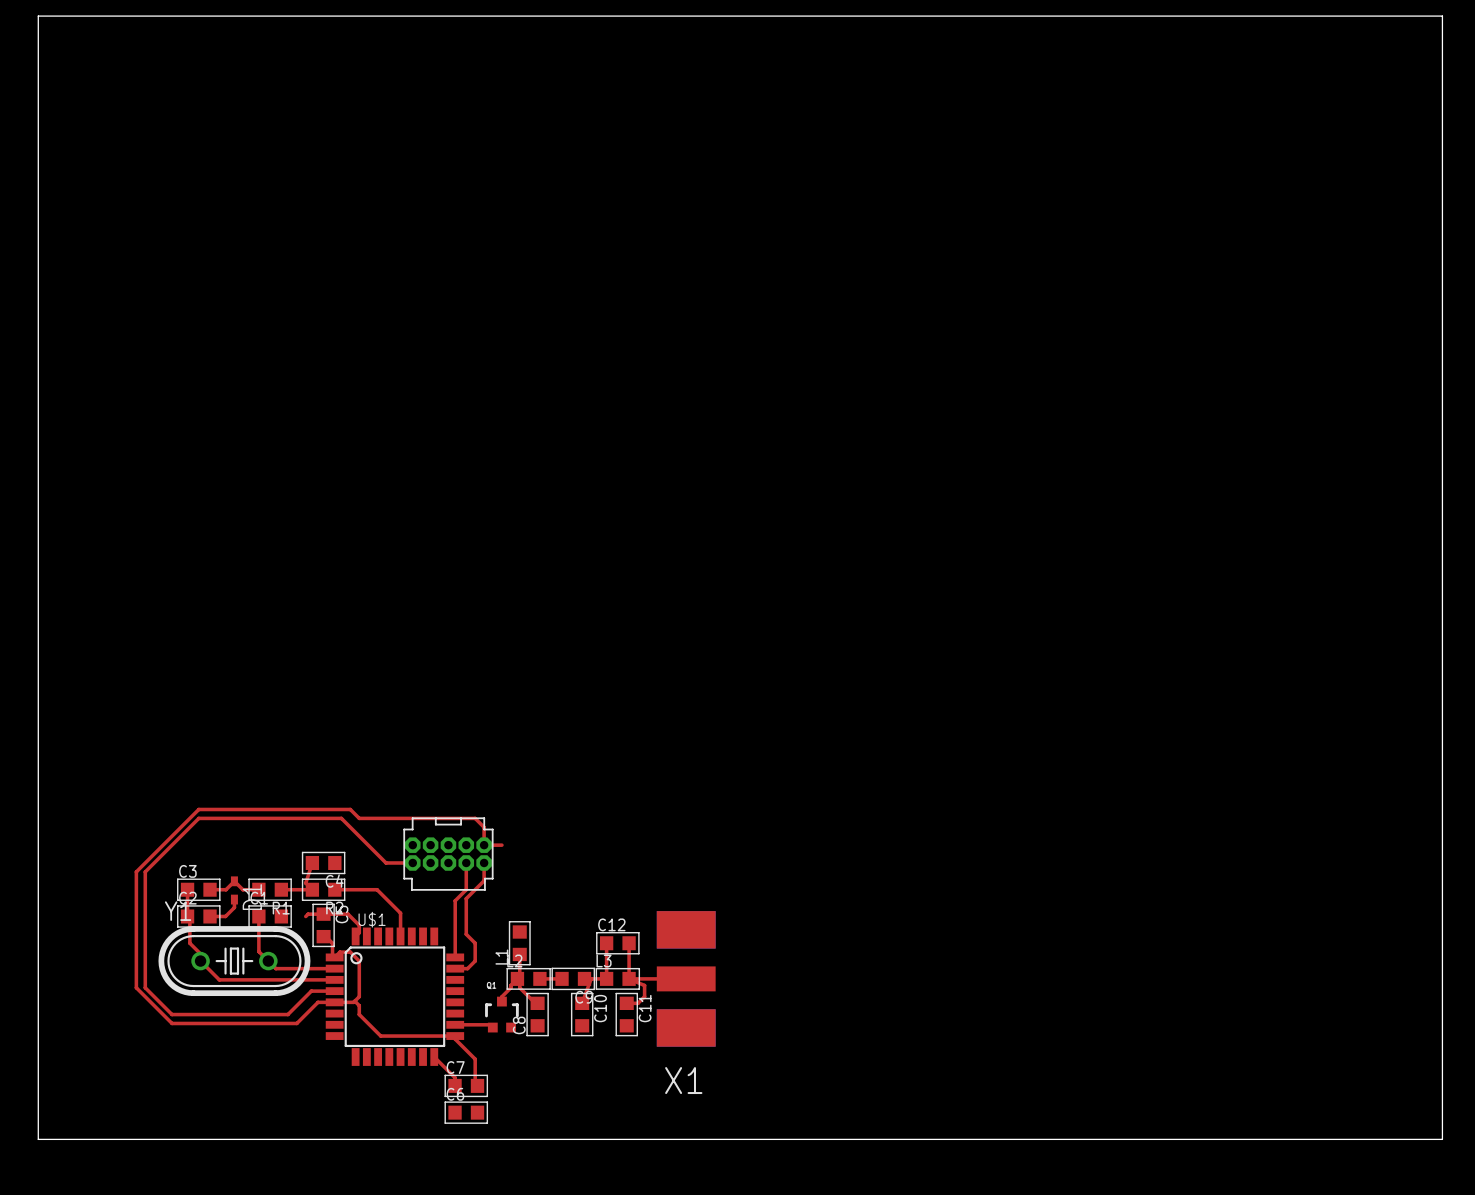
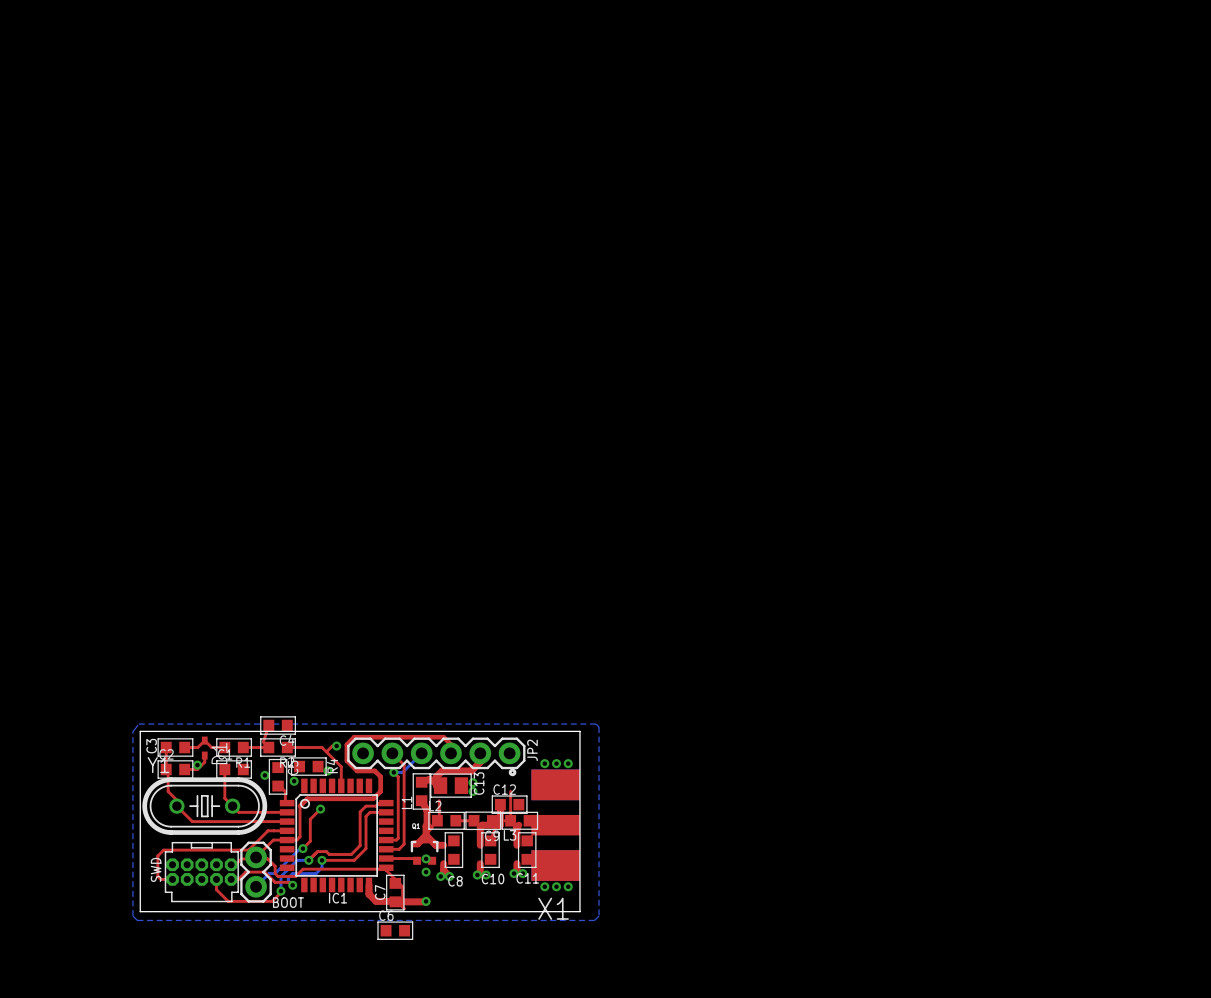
board edge: (38, 16) (1442, 16) (1442, 1139) (38, 1139) (38, 16) -> none
top track: (501, 845) (484, 845) (484, 827) (475, 818) (359, 818) (350, 809) (198, 809) (136, 871) (136, 987) (172, 1023) (296, 1023) -> none
part position: (448, 854) -> (201, 872)
bottom zone outline: none -> (138, 724) (596, 724) (599, 726) (599, 916) (594, 920) (137, 920) (132, 916) (132, 731) (138, 724)
top track: (412, 862) (386, 862) (341, 818) (198, 818) (145, 871) (145, 987) (172, 1014) (184, 1014) -> (172, 879) (160, 879) (157, 876) (157, 855) (163, 850)
top track: (466, 862) (466, 889) (455, 900) (455, 957) -> (308, 860) (317, 851) (326, 851) (329, 854) (351, 854) (360, 845) (360, 812) (365, 806) (376, 806) (379, 803) (386, 803)
top track: (484, 862) (484, 880) (466, 898) (466, 934) (475, 943) (475, 961) (467, 968) (455, 968) -> (322, 860) (354, 860) (365, 848) (365, 816) (370, 812) (386, 812)
board edge: none -> (140, 731) (579, 731) (579, 911) (140, 911) (140, 731)
C3 name rotation: 0° (187, 871) -> 90° counterclockwise (151, 746)
top track: none -> (336, 746) (332, 746) (326, 751)
via: none -> (336, 746)
top track: none -> (392, 753) (404, 765) (404, 844) (399, 849) (386, 849)
bottom track: none -> (421, 753) (402, 772) (393, 772)
JP2: none -> (436, 753)
top track: none -> (480, 753) (480, 762) (471, 770) (442, 770) (436, 776) (436, 785) (440, 785) (429, 779) (421, 782)
via: none -> (544, 763)
via: none -> (556, 763)
via: none -> (568, 763)
via: none -> (197, 765)
R4: none -> (308, 766)
drawing: none -> [508, 768, 517, 777]
top track: (305, 916) (308, 914) (348, 914) (359, 925) (359, 932) (355, 936) -> none
via: none -> (327, 770)
U$1 name: U$1 (372, 919) -> IC1 (338, 898)
top track: none -> (393, 772) (398, 776) (398, 838) (386, 840)
via: none -> (393, 772)
via: none -> (264, 775)
via: none -> (294, 781)
via: none -> (472, 782)
C13: none -> (451, 785)
L1 position: (519, 943) -> (421, 791)
via: none -> (472, 791)
C12 position: (617, 943) -> (509, 804)
top track: (629, 943) (629, 978) (644, 985) (644, 996) (638, 1003) (626, 1003) -> none
top track: none -> (421, 800) (427, 810) (426, 835)
top track: (334, 957) (339, 952) (350, 952) (359, 961) (359, 996) (353, 1002) (346, 1002) -> (451, 753) (451, 744) (443, 737) (354, 737) (346, 744) (346, 760) (357, 770) (374, 770) (380, 776) (380, 791) (373, 798) (307, 798) (300, 806) (300, 836) (296, 840)
top track: none -> (500, 804) (500, 825) (482, 825) (480, 827) (480, 845)
L3 name position: L3 (604, 960) -> L3 (510, 835)
top track: none -> (320, 809) (310, 819) (310, 841) (302, 848)
via: none -> (320, 809)
top track: (517, 978) (519, 981) (519, 987) (535, 1003) (537, 1003) -> none
X1 position: (686, 978) -> (555, 825)
top track: none -> (518, 825) (516, 827) (516, 845)
top track: none -> (426, 835) (435, 845) (443, 845)
top track: none -> (426, 835) (417, 843) (414, 843)
top track: (354, 1001) (359, 1005) (359, 1014) (380, 1036) (452, 1036) -> (231, 864) (235, 864) (241, 858) (267, 858) (275, 866) (275, 873) (278, 876) (295, 876) (302, 869) (383, 867)
C10 name rotation: 0° (600, 1008) -> 90° clockwise (493, 879)
C10 name position: C10 (600, 1008) -> C10 (493, 879)
C11 name rotation: 0° (645, 1008) -> 90° clockwise (527, 878)
C11 name position: C11 (645, 1008) -> C11 (527, 878)
bottom track: none -> (302, 848) (301, 847) (275, 873) (269, 873) (256, 886)
via: none -> (302, 848)
via: none -> (426, 858)
C8 name rotation: 0° (519, 1025) -> 90° clockwise (455, 881)
C8 name position: C8 (519, 1025) -> C8 (455, 881)
bottom track: none -> (308, 860) (297, 860) (280, 876) (280, 891)
via: none -> (308, 860)
bottom track: none -> (322, 860) (322, 867) (316, 873) (292, 873) (288, 877) (288, 880) (292, 885)
via: none -> (322, 860)
top track: none -> (443, 863) (443, 870) (449, 876)
top track: none -> (480, 863) (480, 873) (477, 875)
top track: none -> (516, 863) (516, 870) (514, 873)
text: none -> SWD (156, 869)
part: none -> (256, 872)
via: none -> (426, 872)
via: none -> (514, 873)
via: none -> (522, 873)
via: none -> (477, 875)
via: none -> (486, 875)
via: none -> (440, 876)
via: none -> (449, 876)
top track: none -> (216, 879) (216, 889) (228, 901) (272, 901) (280, 891)
top track: none -> (231, 879) (238, 879) (245, 872) (264, 872) (275, 882) (289, 882) (292, 885)
via: none -> (292, 885)
top track: (434, 1057) (455, 1077) (455, 1085) -> (368, 884) (368, 894) (376, 901) (426, 901)
via: none -> (544, 886)
via: none -> (556, 886)
via: none -> (568, 886)
via: none -> (280, 891)
via: none -> (426, 901)
text: none -> BOOT (288, 902)
C7 rotation: 0° (466, 1085) -> 90° clockwise (395, 892)

